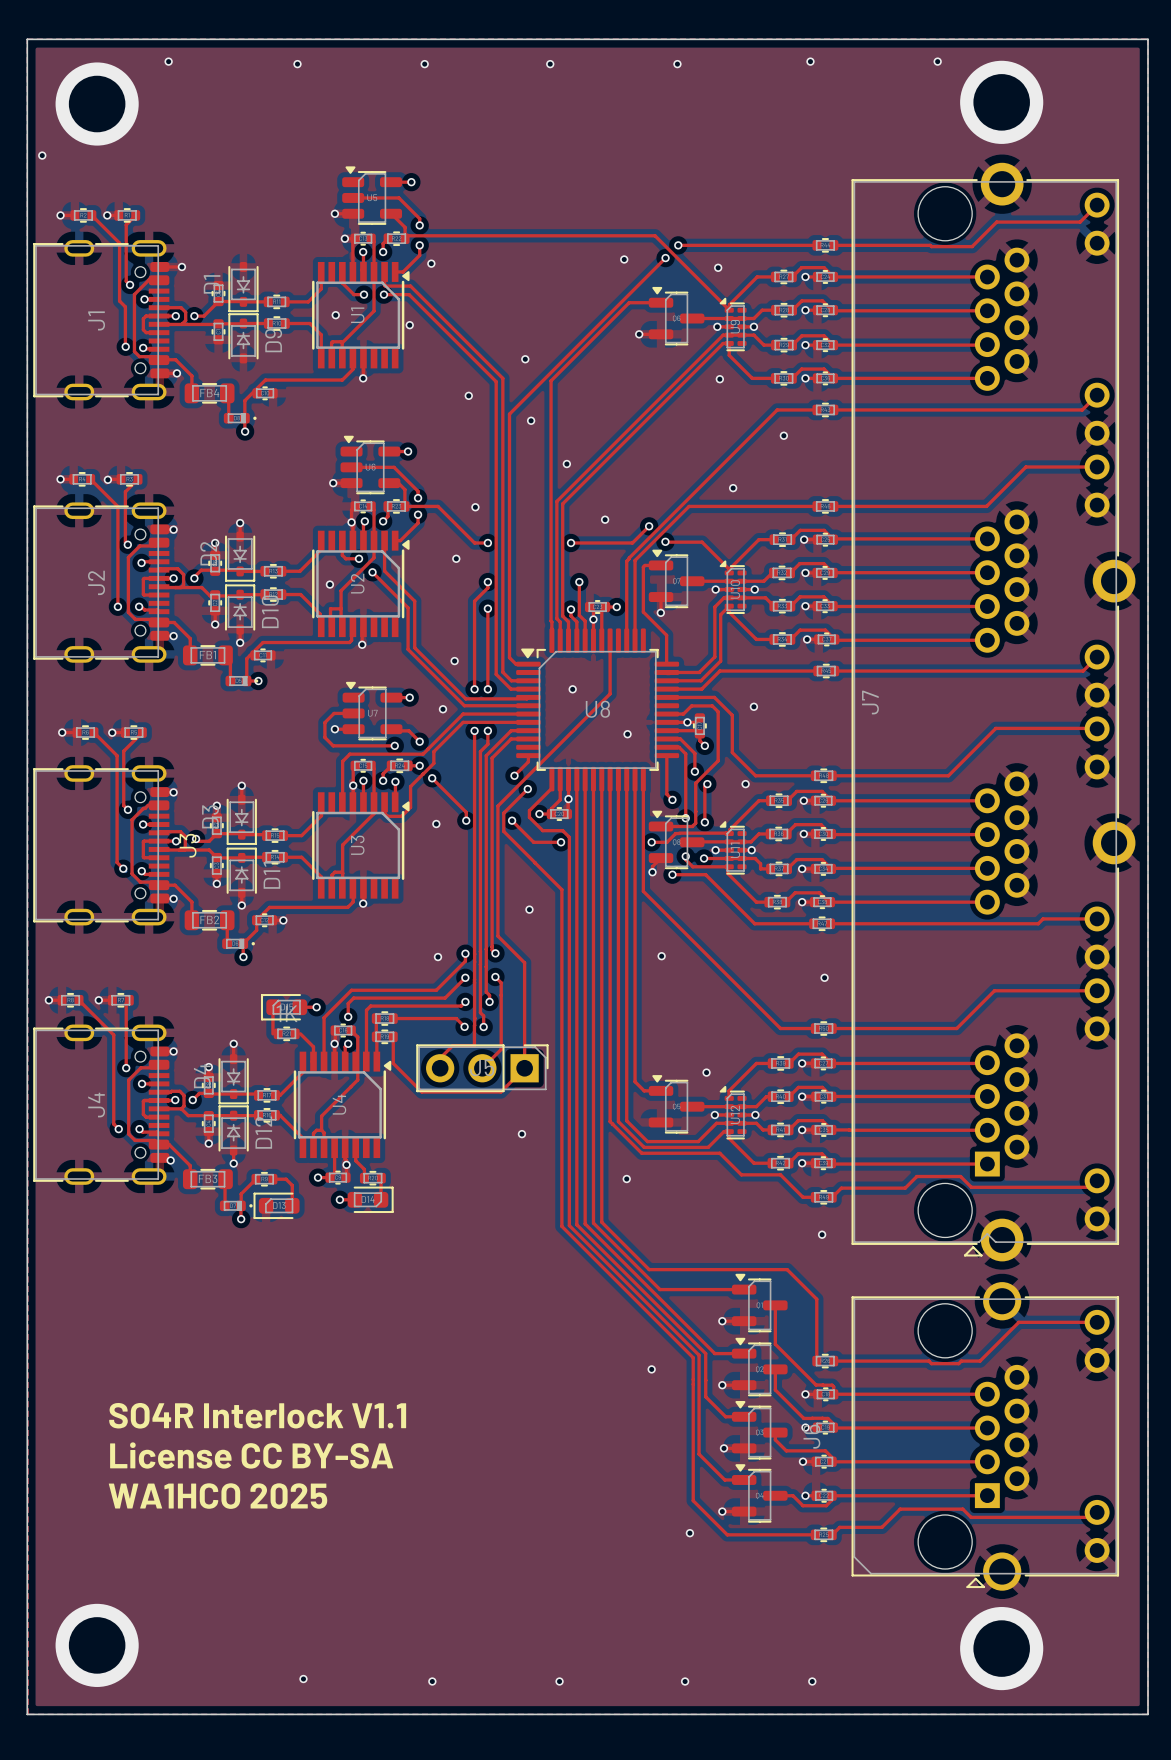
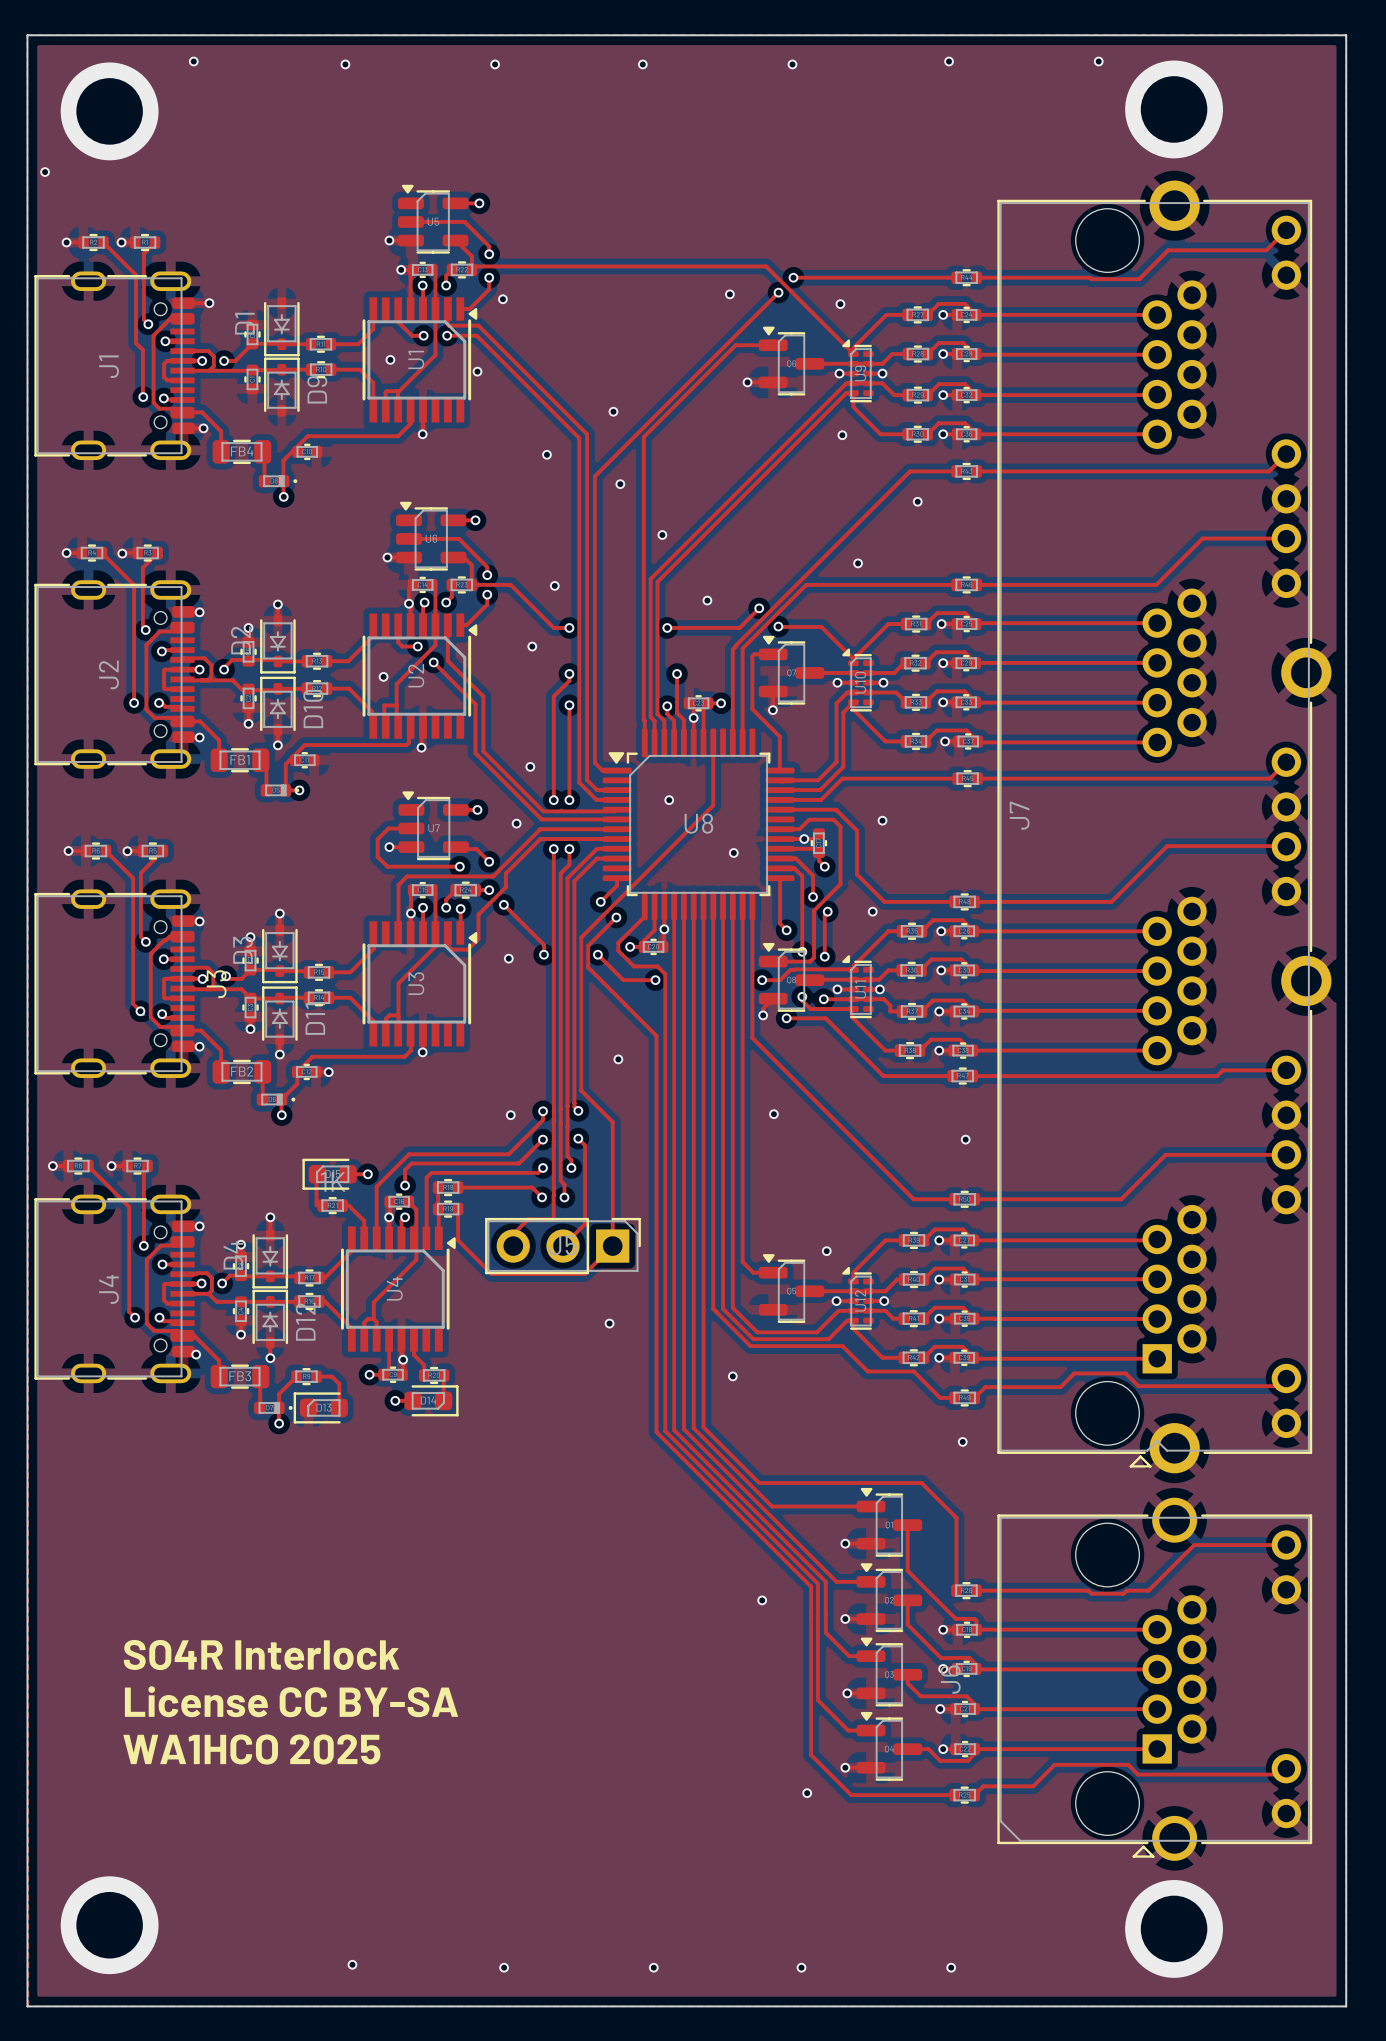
text: SO4R Interlock V1.1 (257, 1415) -> SO4R Interlock (261, 1655)

